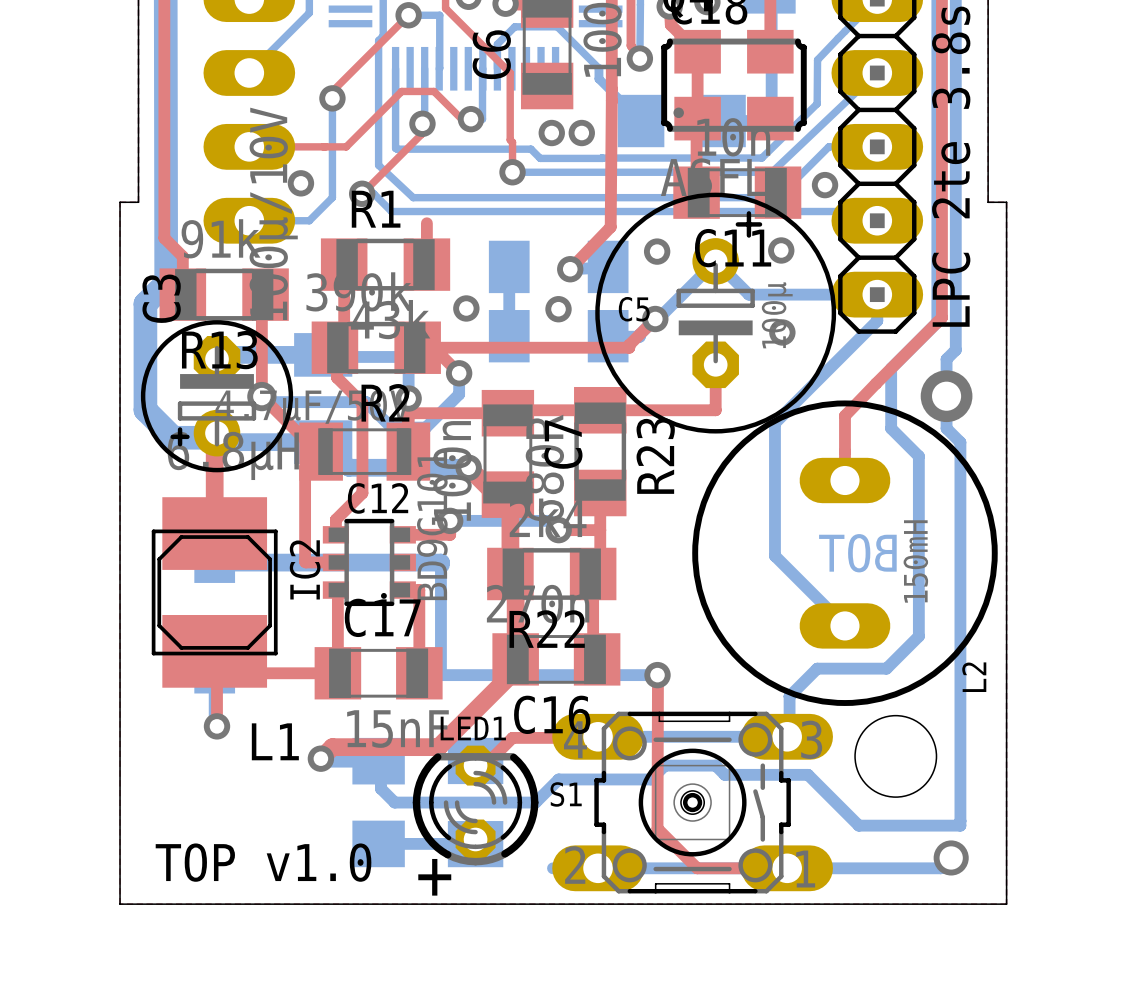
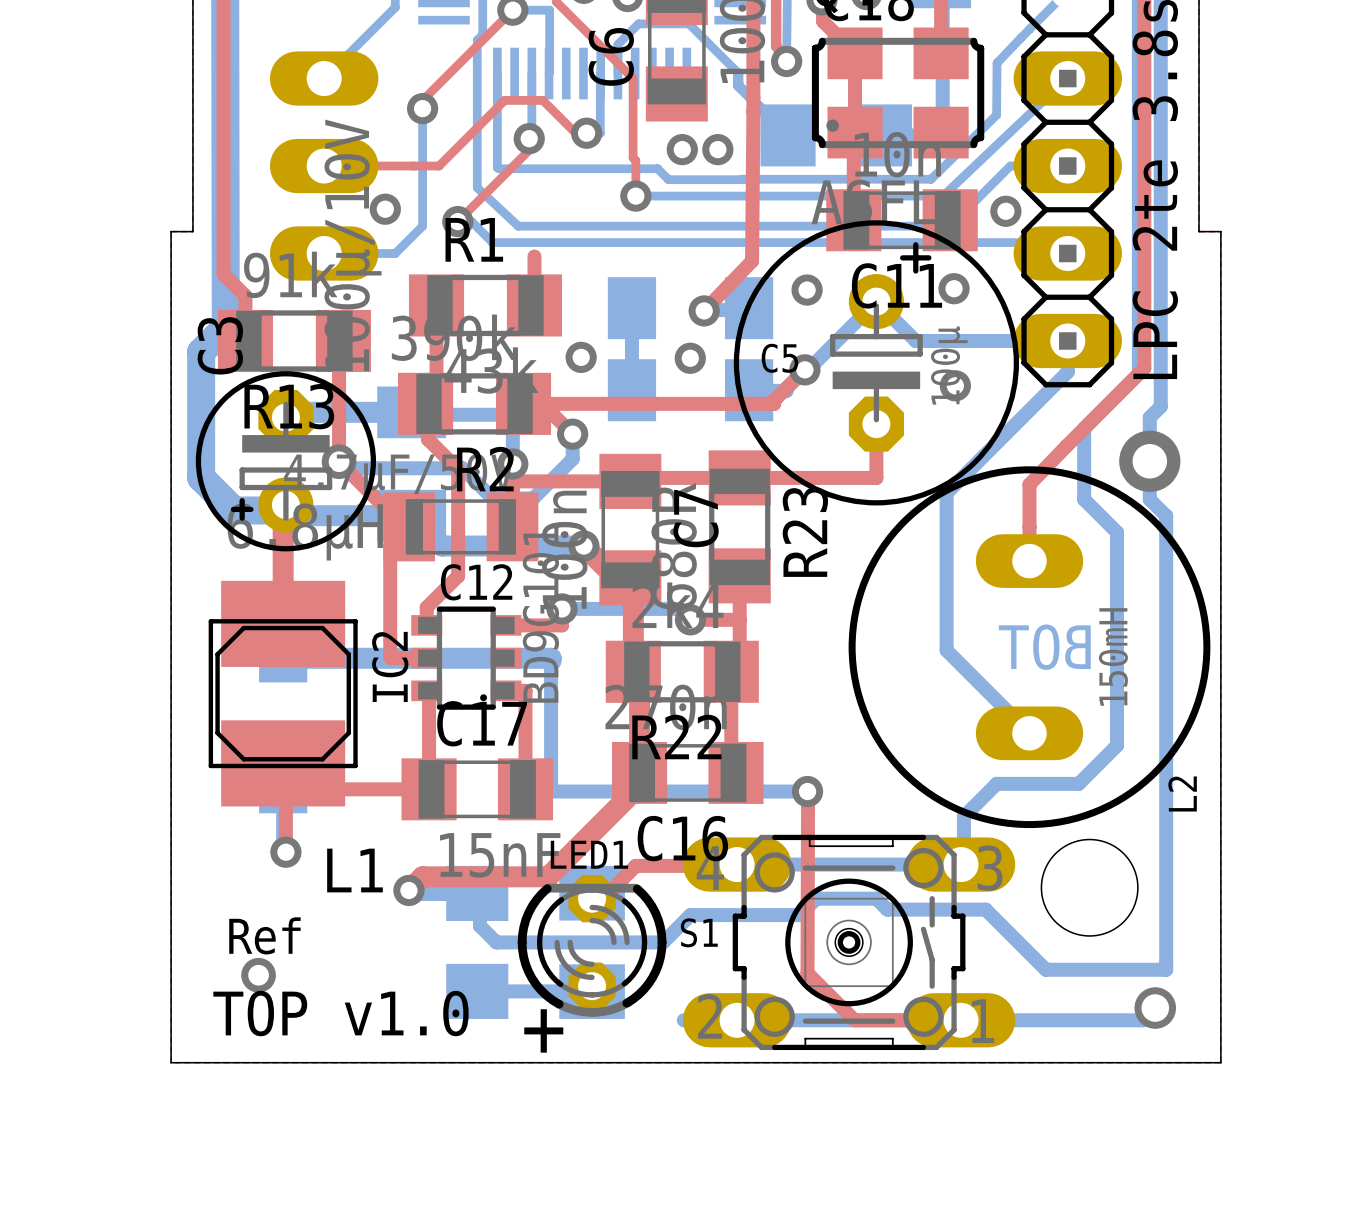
text: none -> Ref (264, 935)
via: none -> (258, 975)

